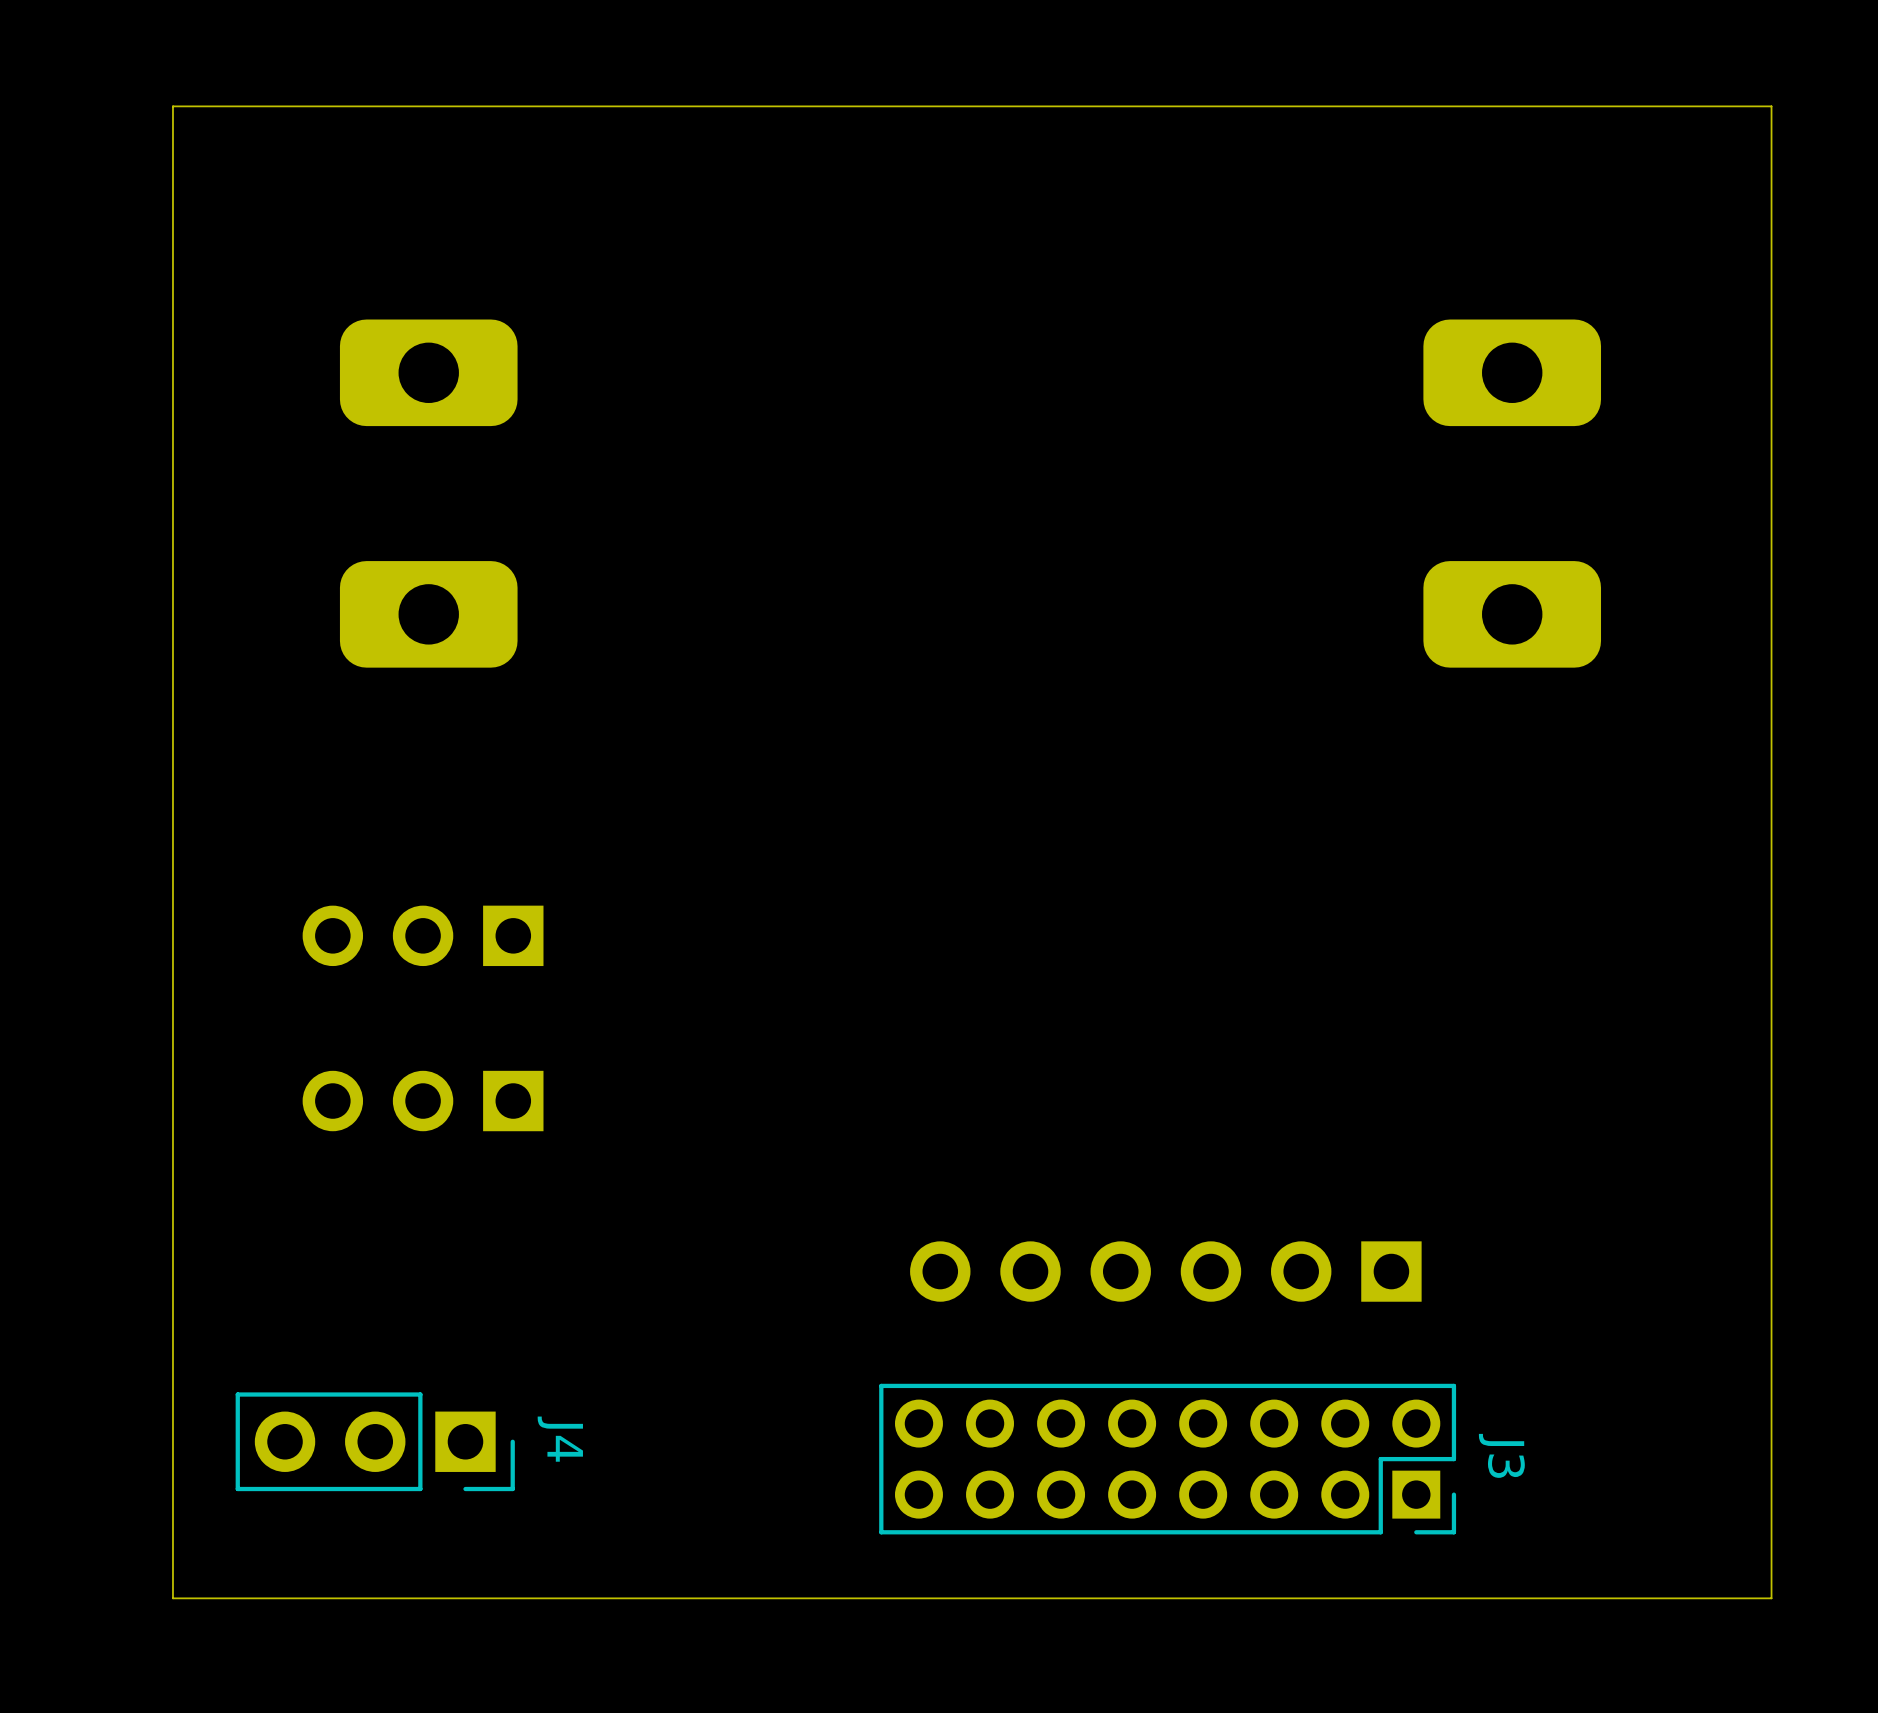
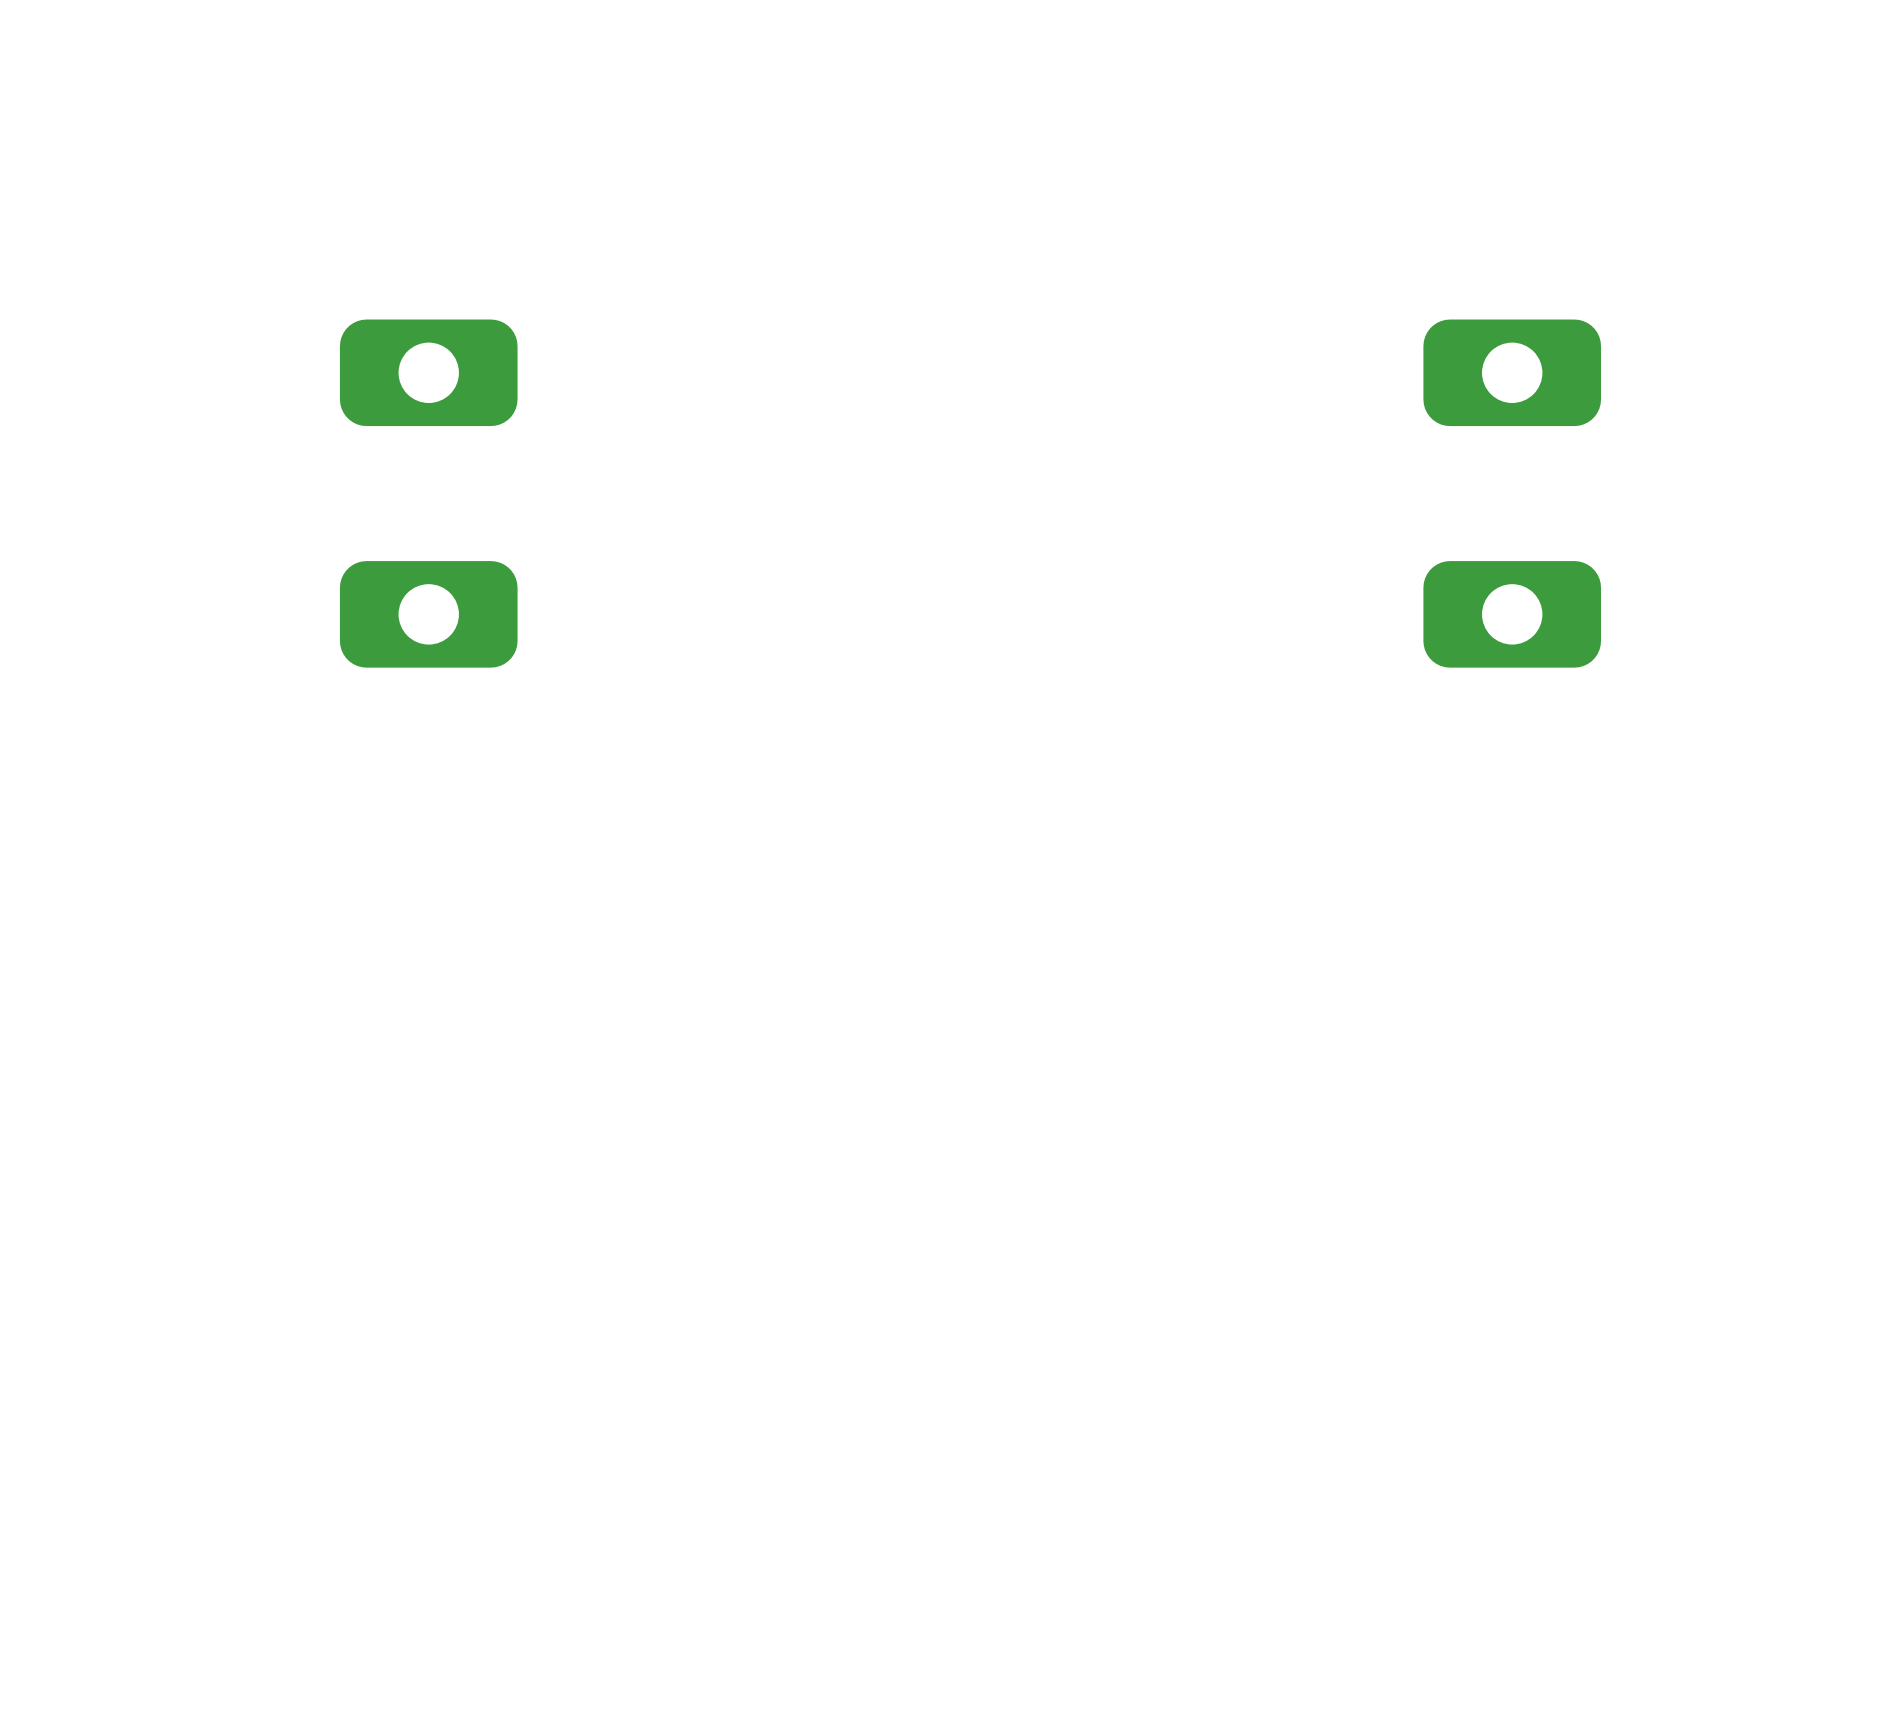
board edge: (1771, 106) (172, 106) (172, 1598) (1771, 1598) (1771, 106) -> none
part: (423, 935) -> none
part: (423, 1101) -> none
part: (1165, 1271) -> none
J4: (375, 1441) -> none
J3: (1167, 1459) -> none

